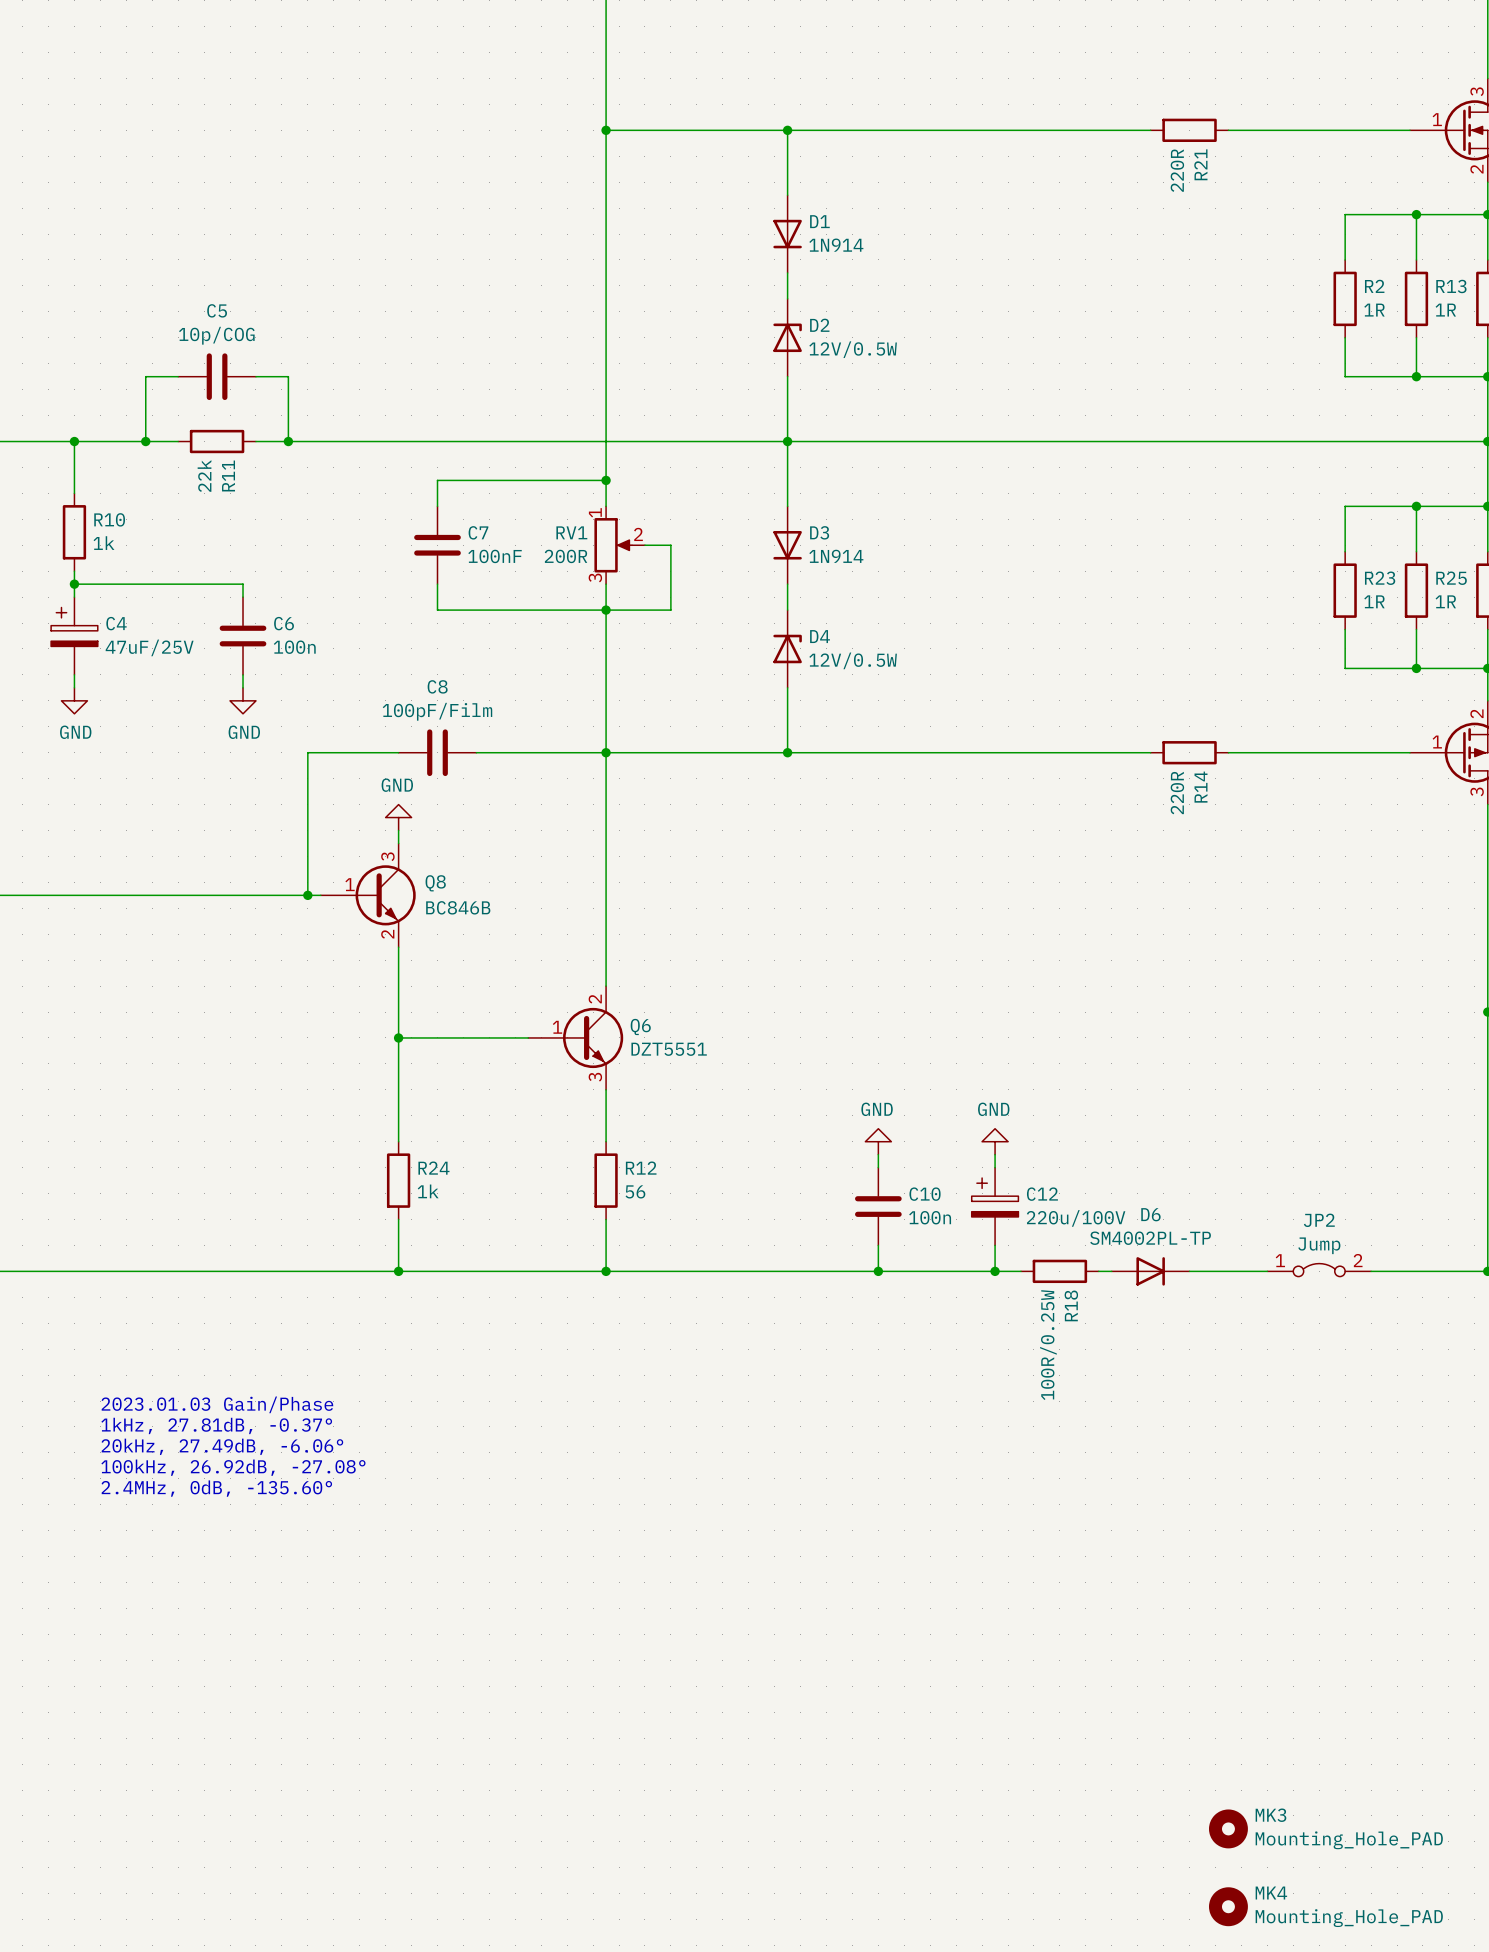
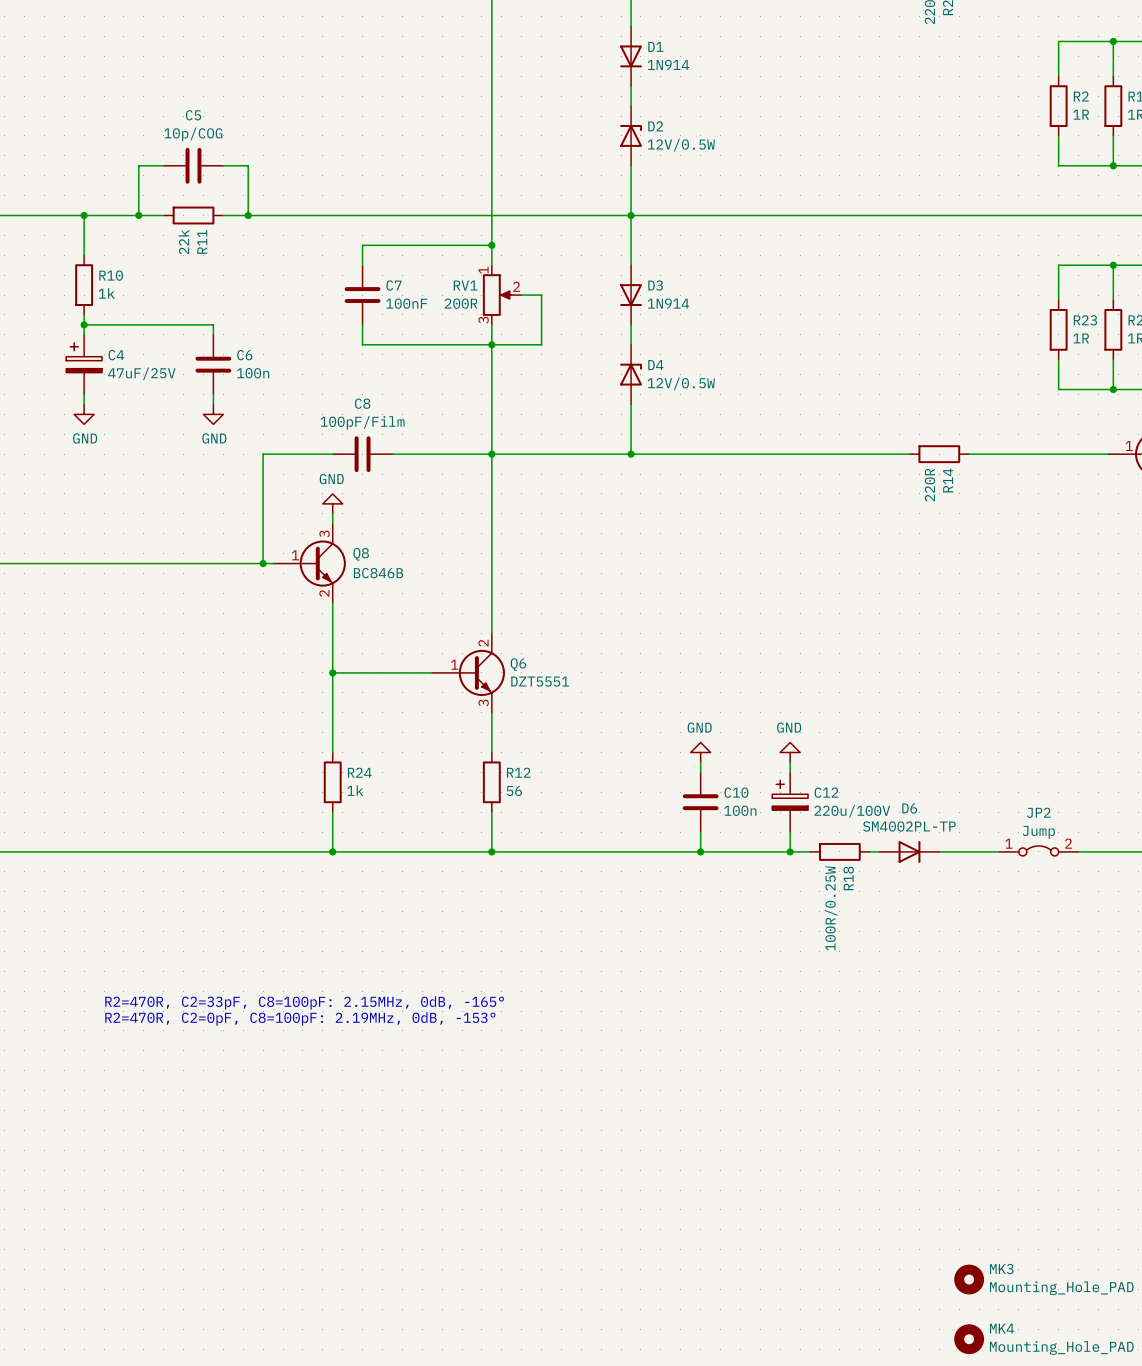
text: 2023.01.03 Gain/Phase (217, 1404) -> none
text: 1kHz, 27.81dB, -0.37° (216, 1425) -> none
text: 20kHz, 27.49dB, -6.06° (222, 1446) -> none
text: 100kHz, 26.92dB, -27.08° (233, 1467) -> R2=470R, C2=33pF, C8=100pF: 2.15MHz, 0dB, -165° (304, 1002)
text: 2.4MHz, 0dB, -135.60° (216, 1488) -> R2=470R, C2=0pF, C8=100pF: 2.19MHz, 0dB, -153° (300, 1018)

